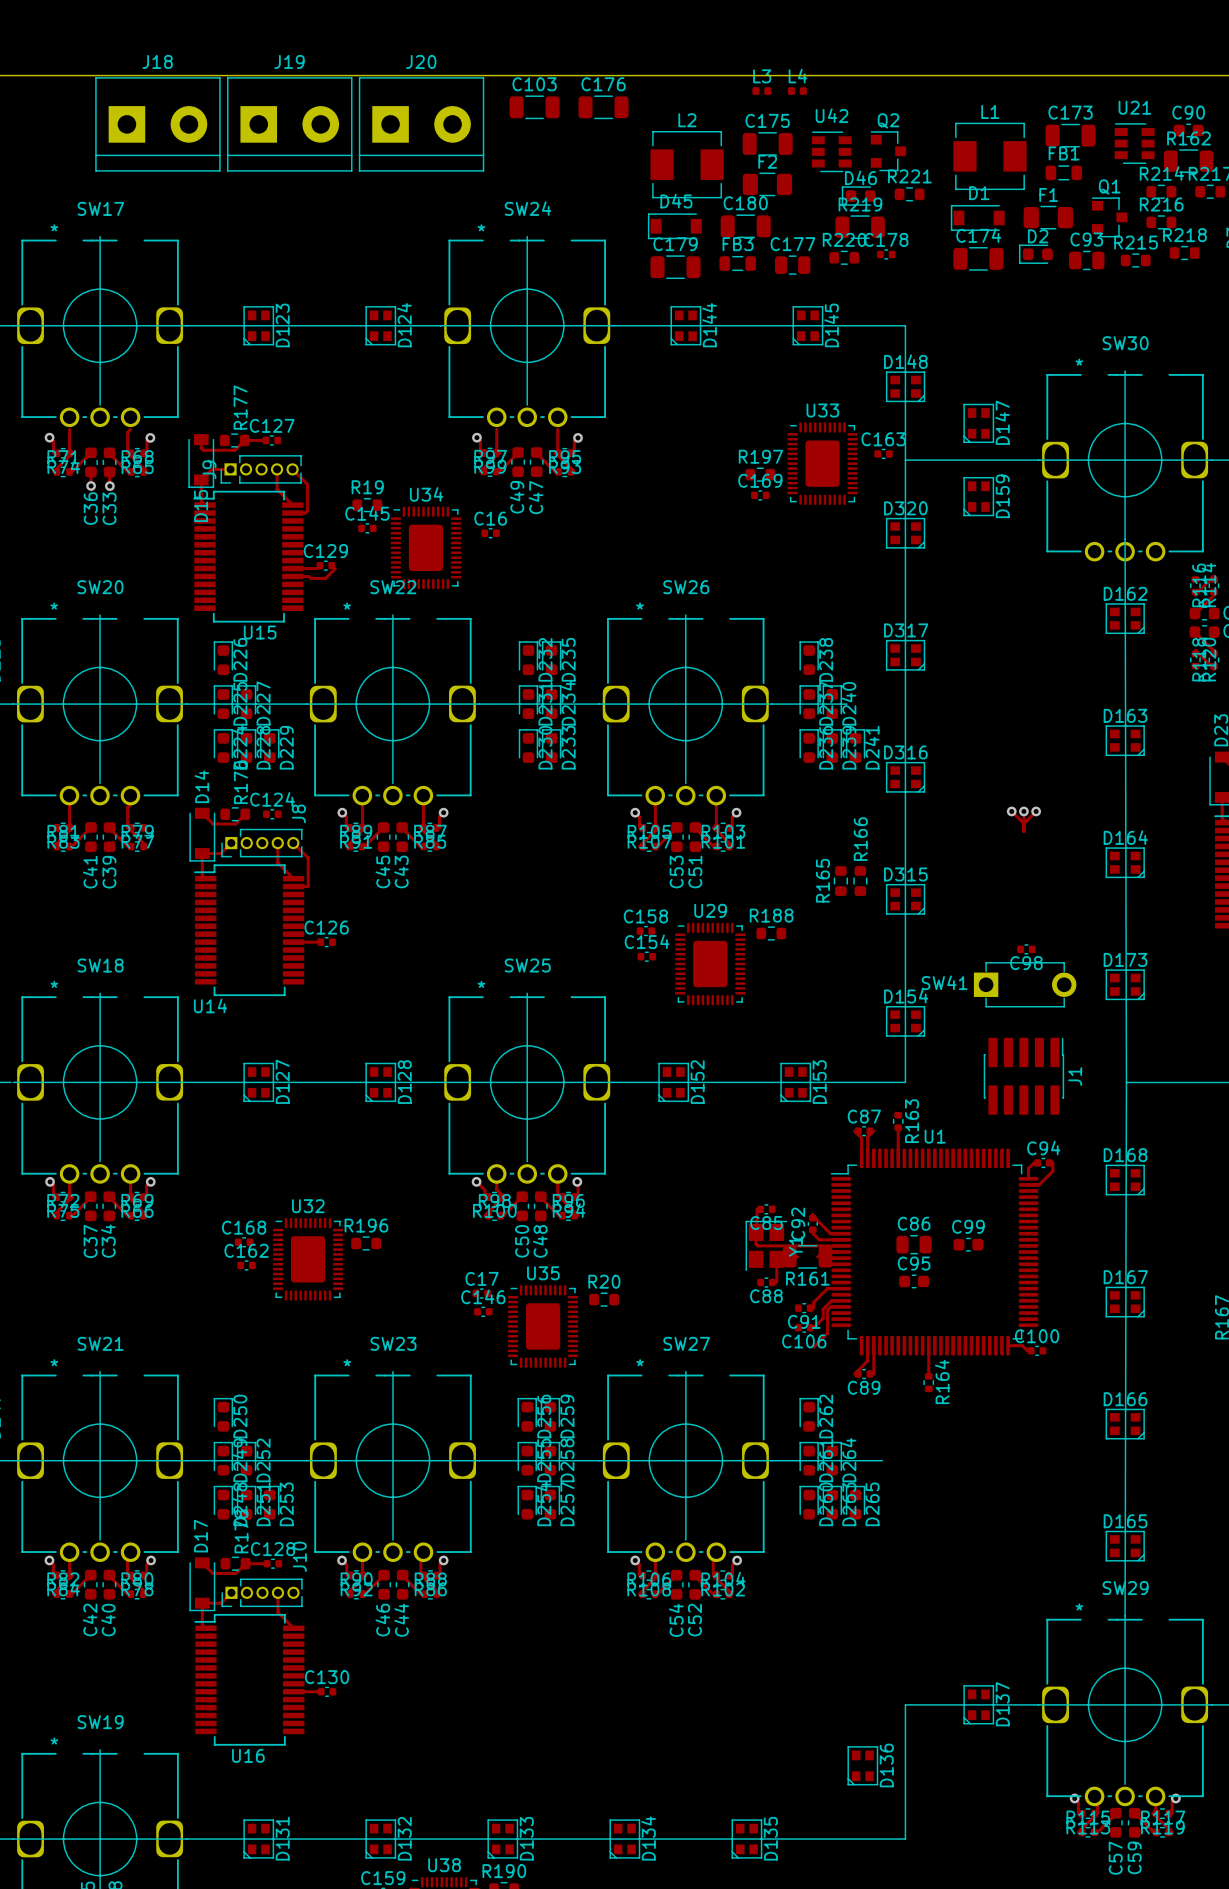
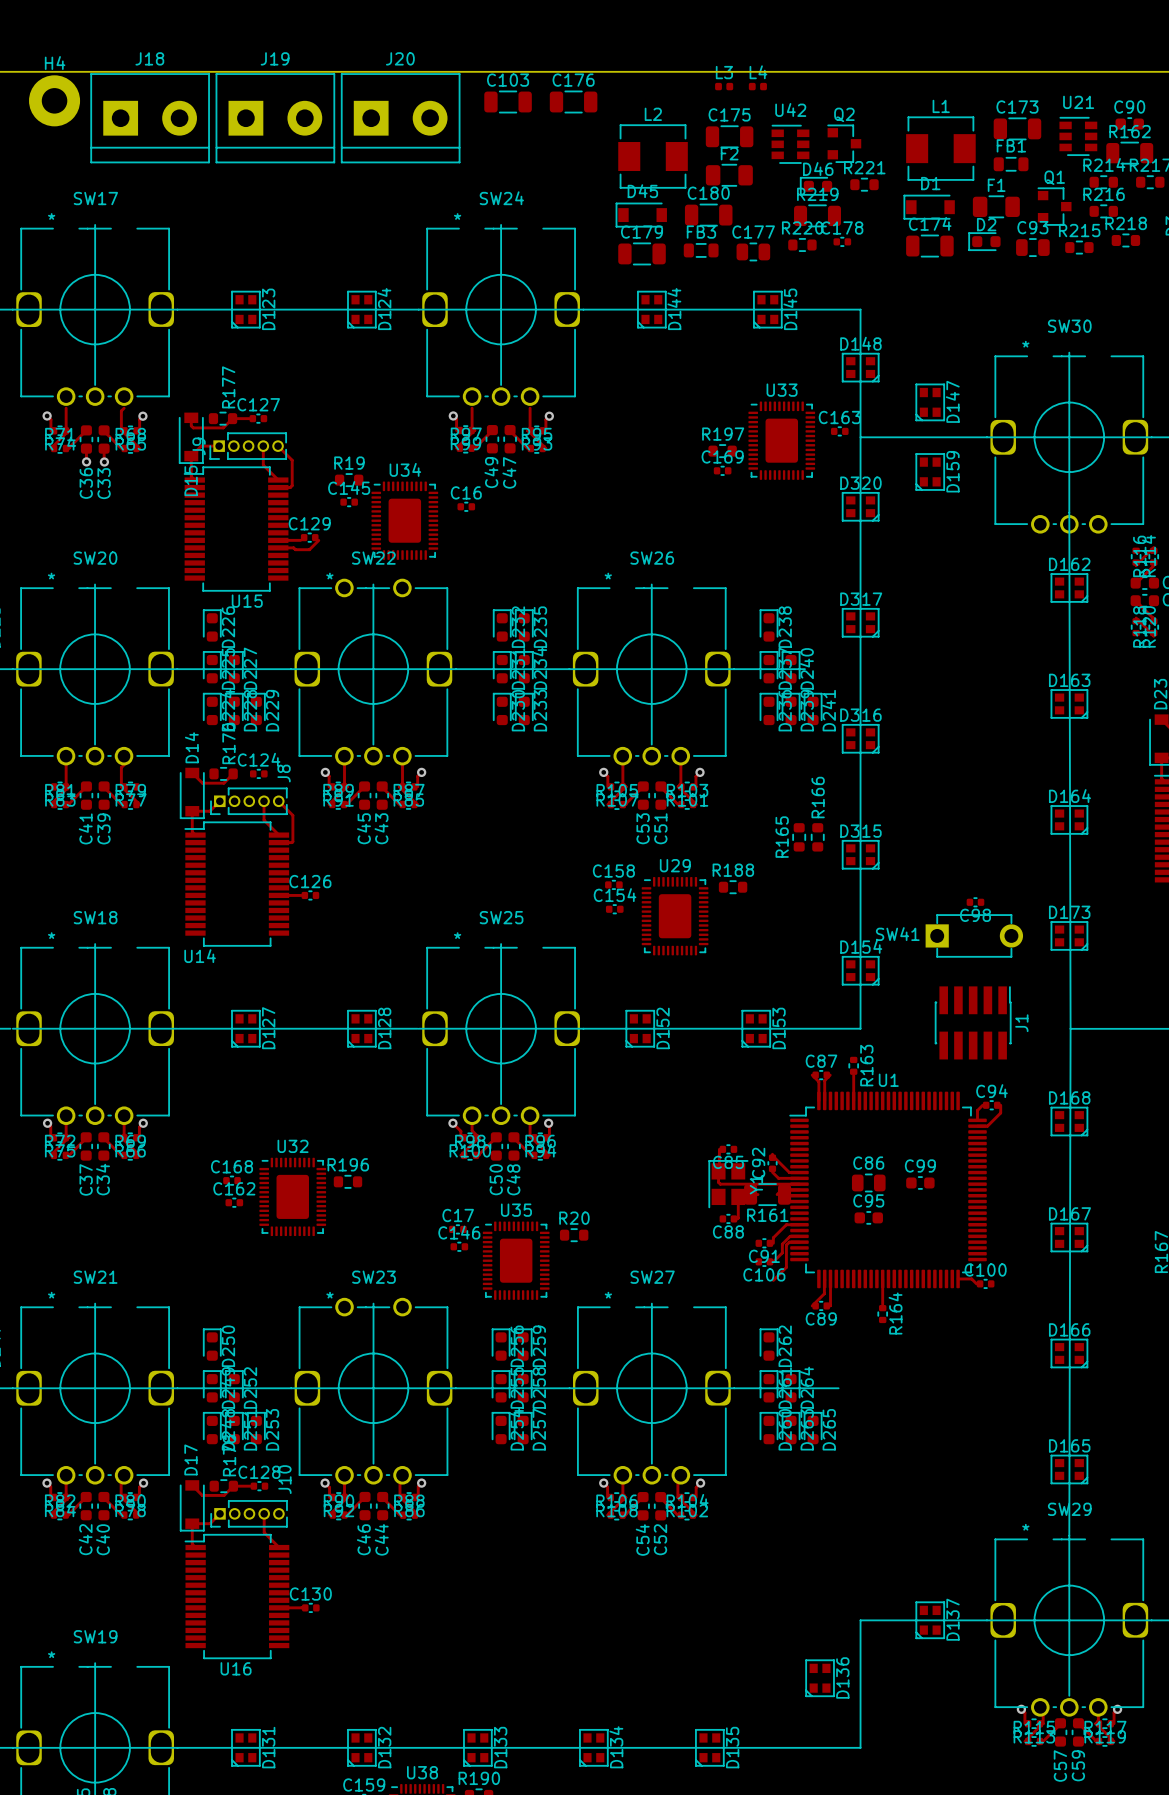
H4: none -> (54, 100)
SW22 footprint: [305, 614, 481, 806] -> [290, 578, 457, 766]
top track: (1011, 811) (1023, 823) (1036, 811) -> none
via: (1011, 811) -> none
top track: (1023, 811) (1023, 831) -> none
via: (1023, 811) -> none
via: (1036, 811) -> none
SW23 footprint: [305, 1370, 481, 1563] -> [290, 1297, 457, 1485]

